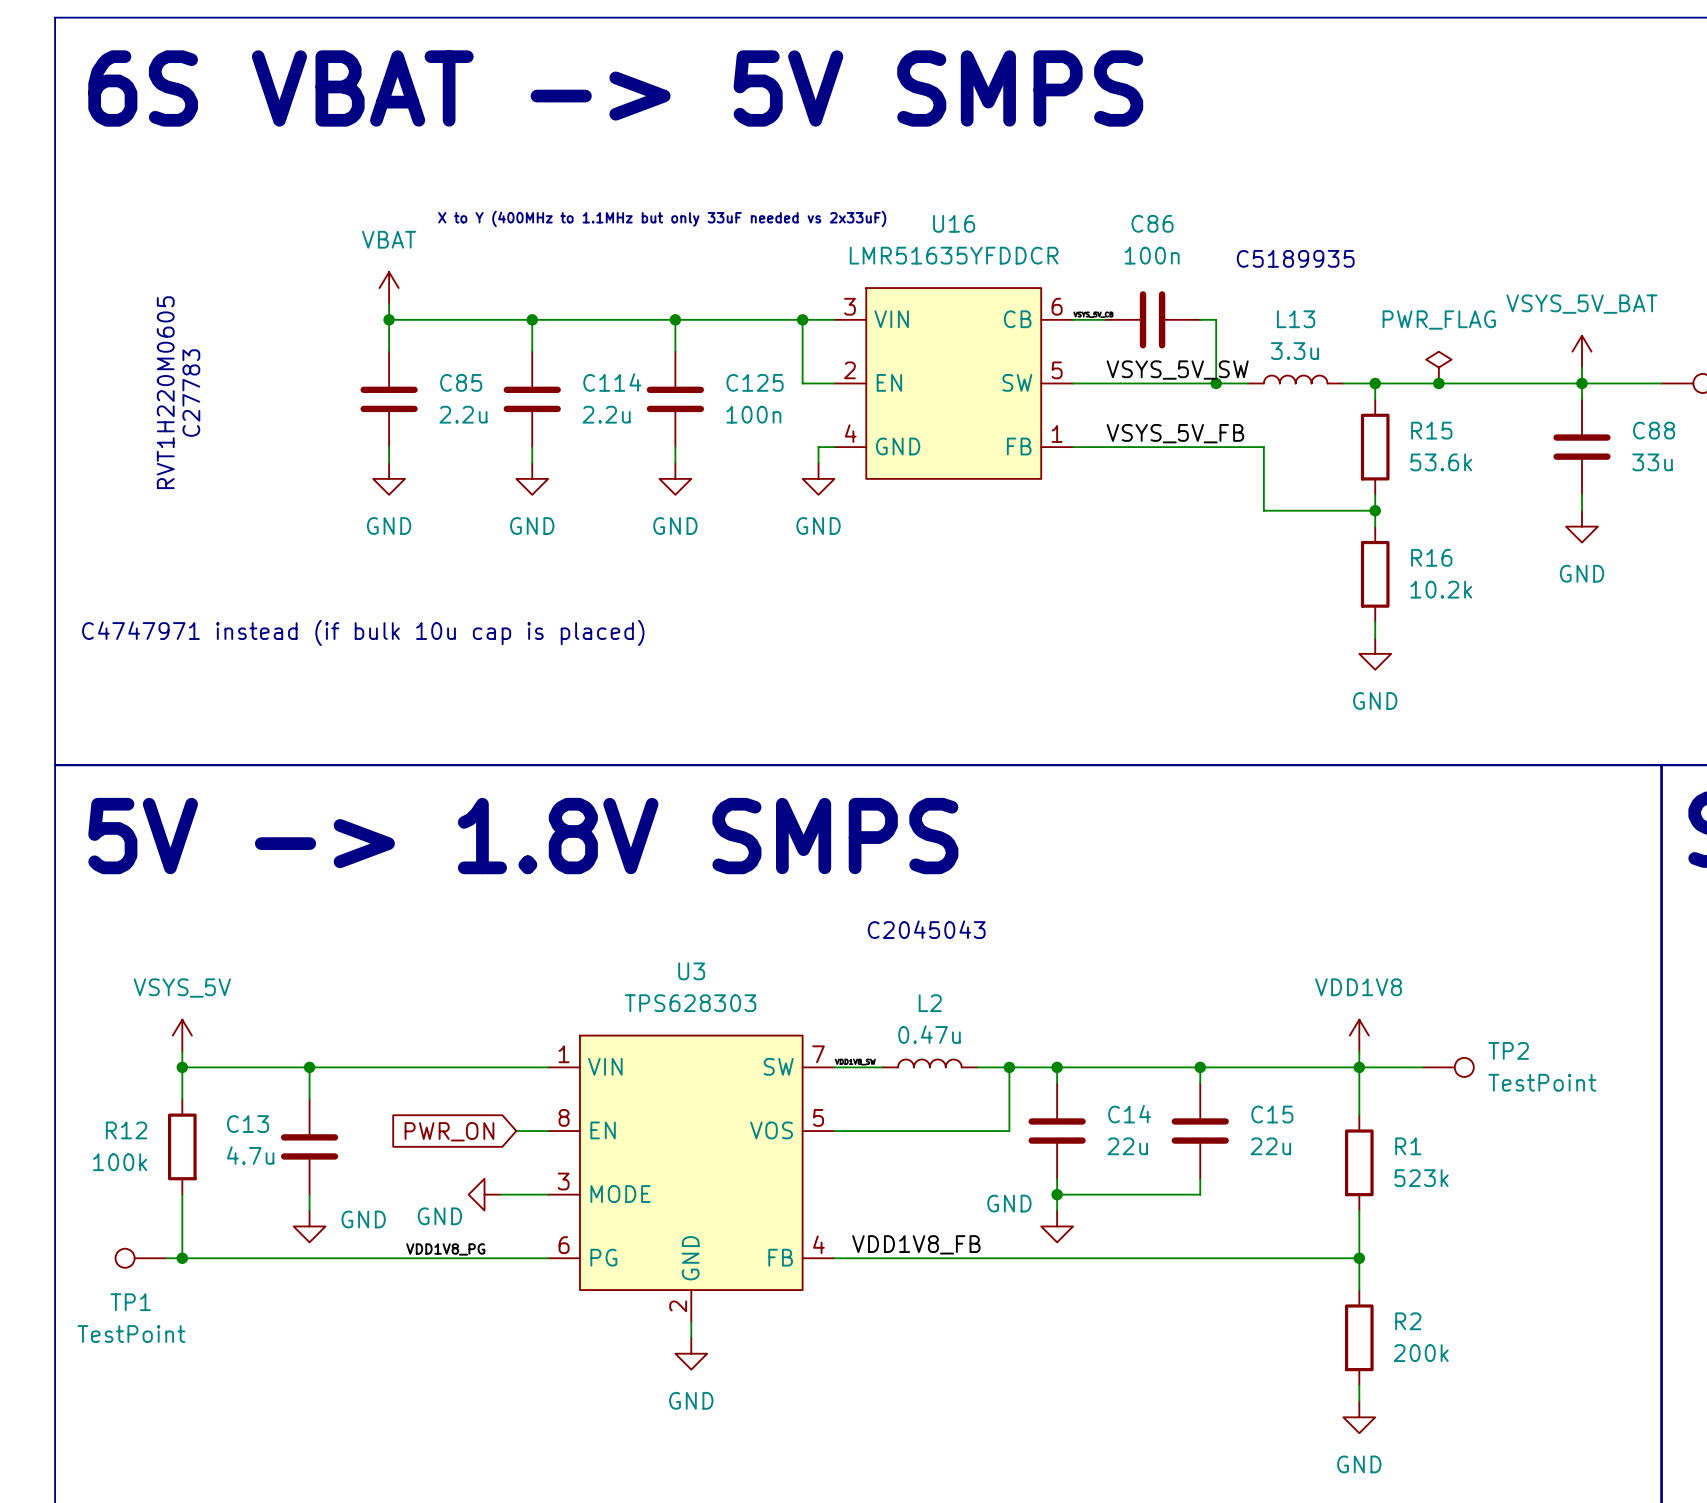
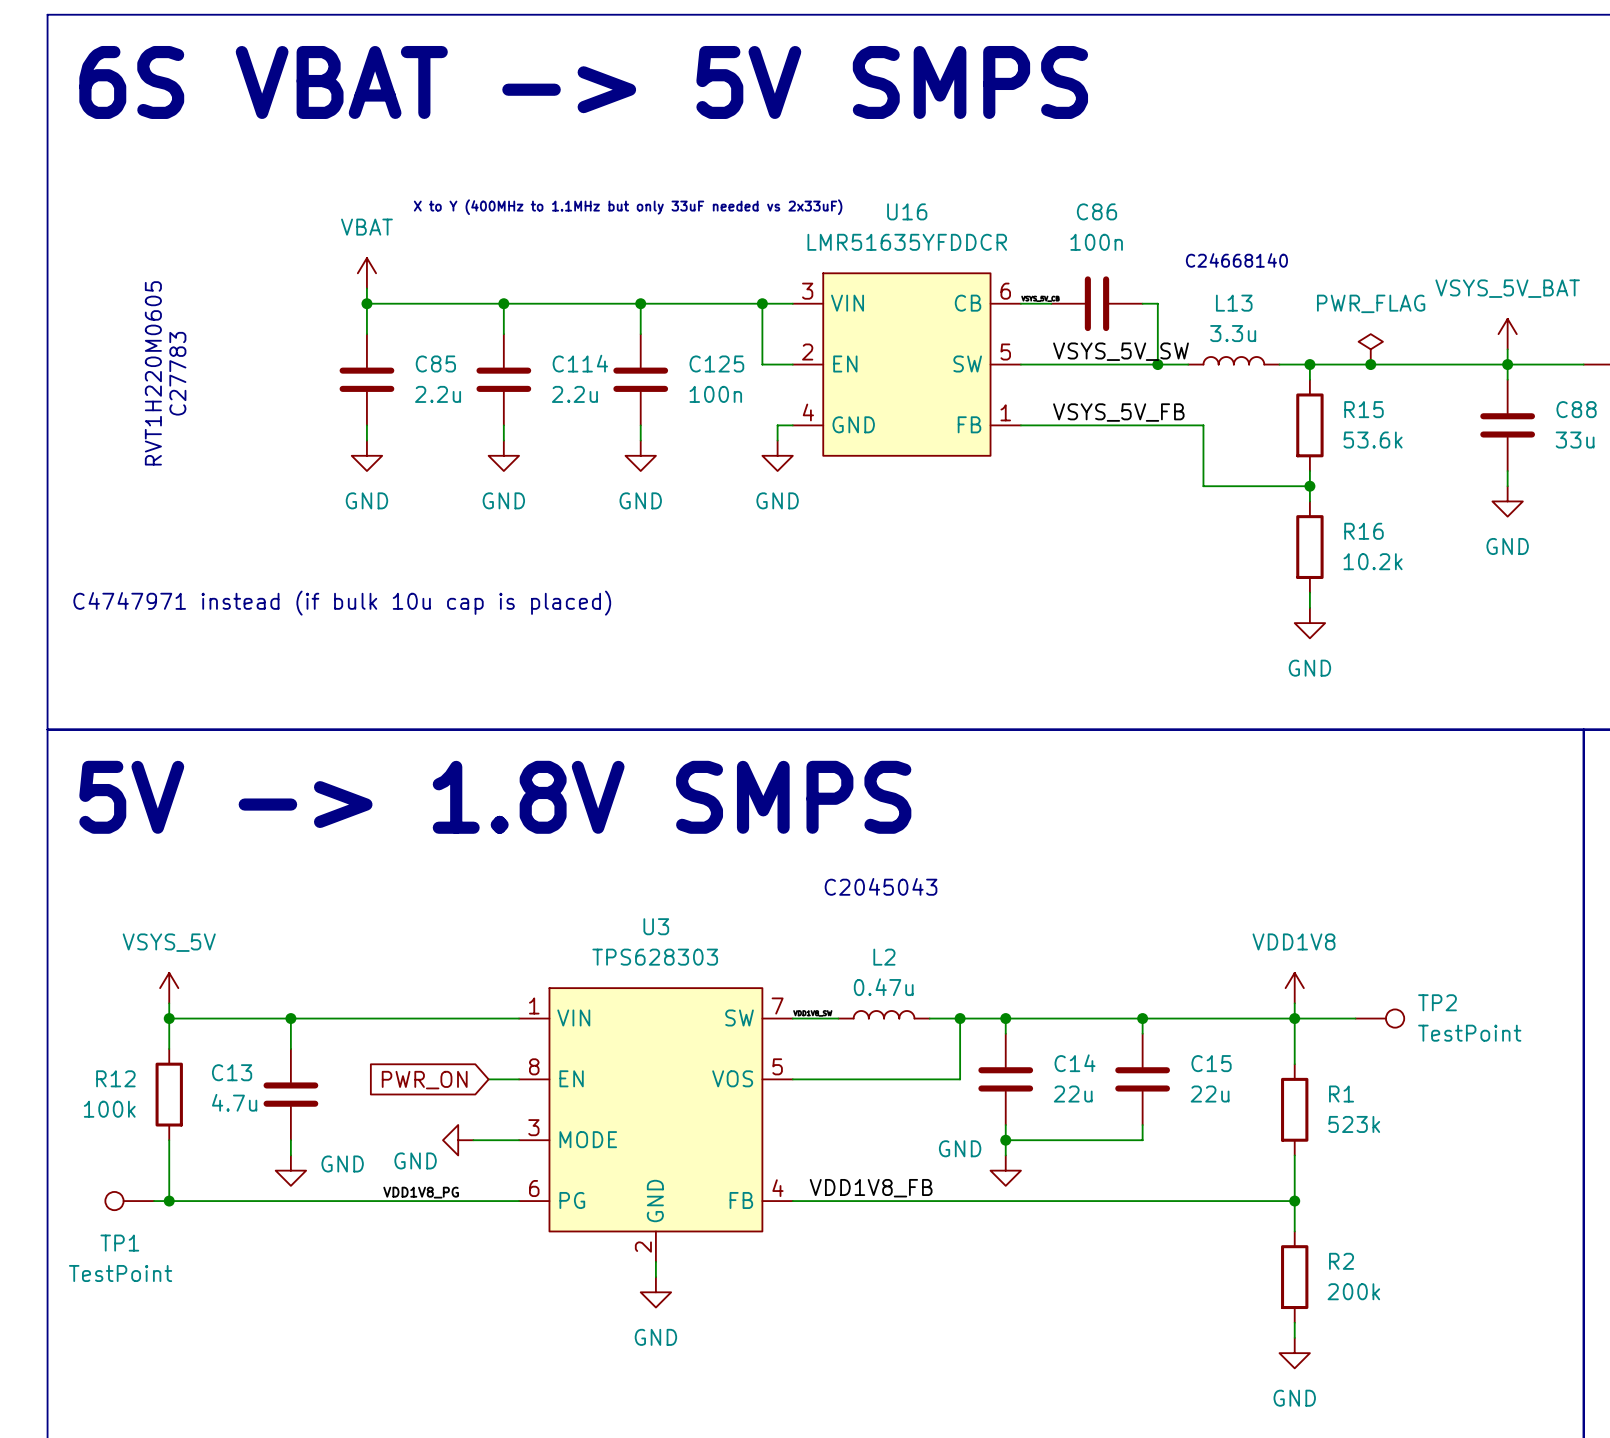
text: C5189935 (1295, 258) -> none
text: none -> C24668140 (1236, 260)

